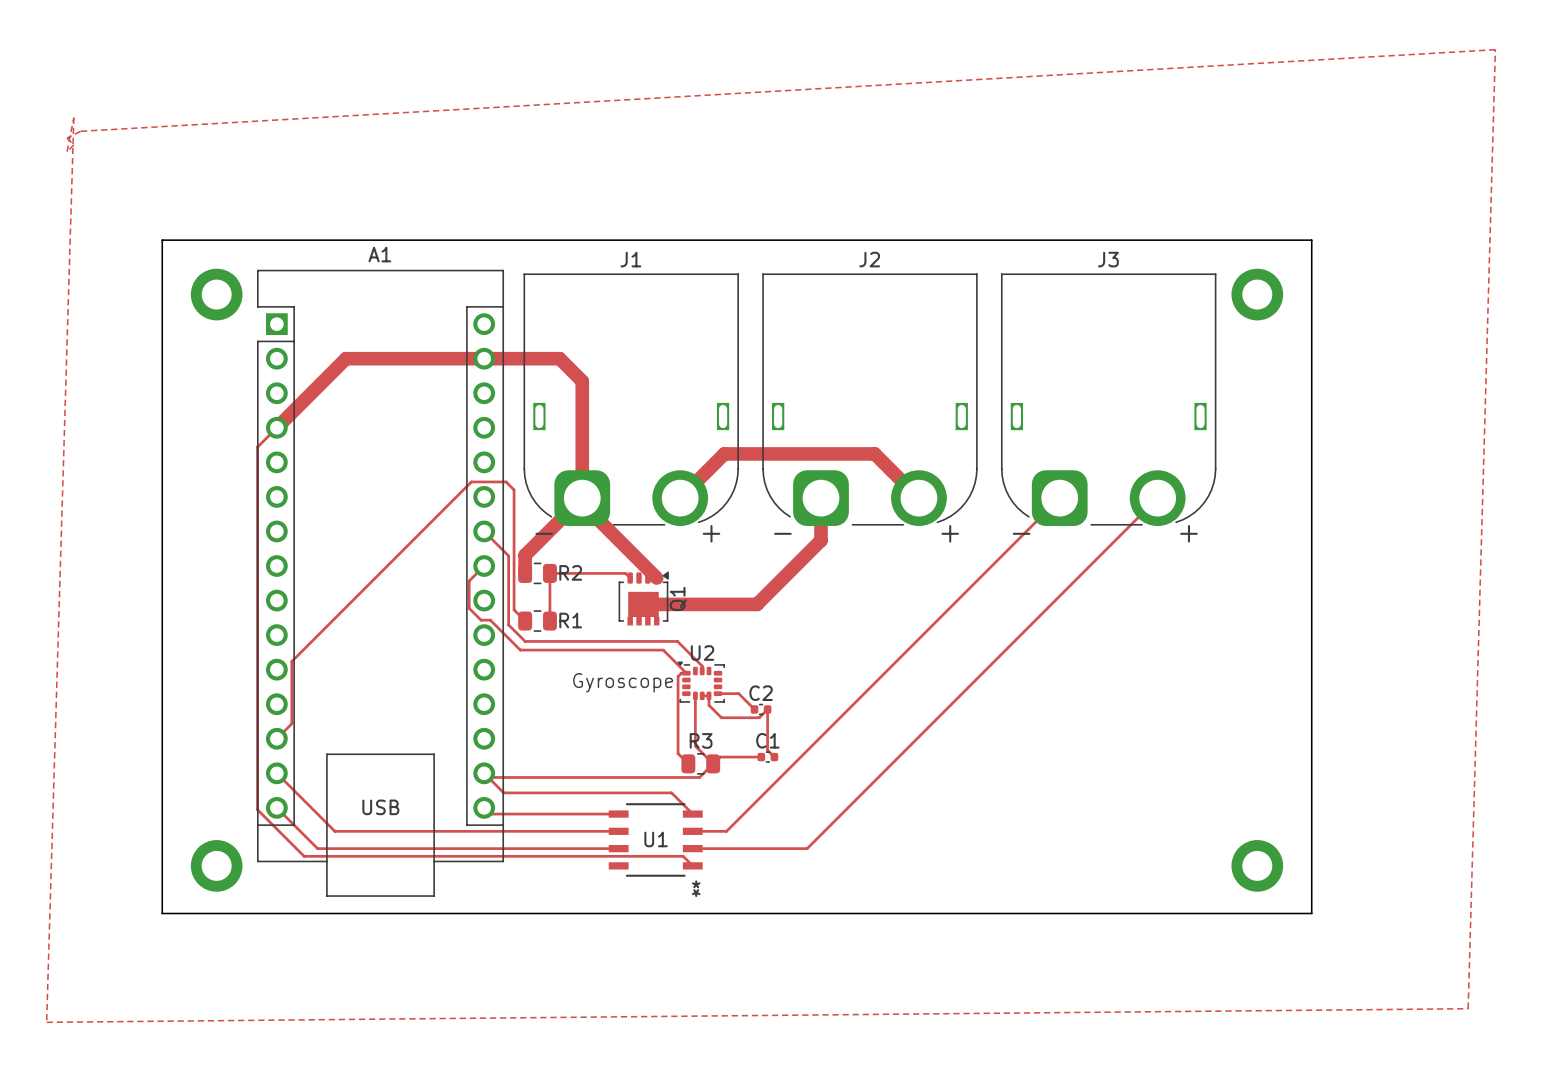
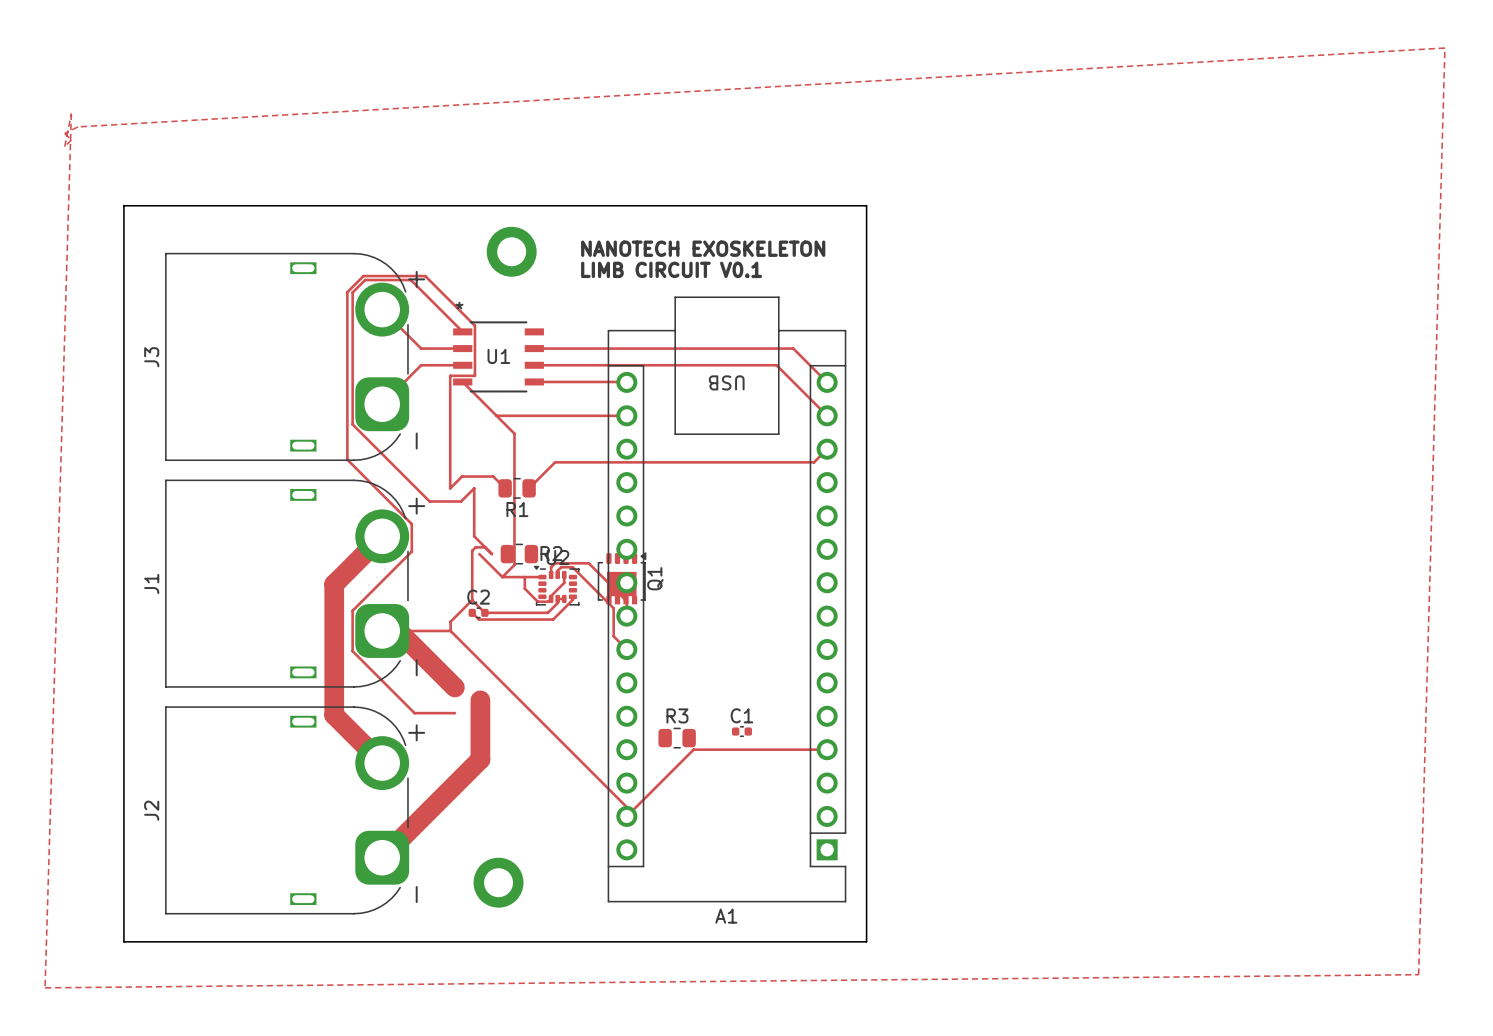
board edge: (162, 240) (1311, 240) (1311, 913) (162, 913) (162, 240) -> (123, 205) (123, 941) (866, 941) (866, 205) (123, 205)
text: none -> NANOTECH EXOSKELETON (703, 248)
text: none -> LIMB CIRCUIT V0.1 (671, 269)
part position: (216, 294) -> (511, 251)
part: (1257, 294) -> none
track: none -> (382, 309) (421, 348) (462, 348)
track: none -> (462, 331) (410, 280) (365, 280) (352, 292) (352, 424) (429, 501) (461, 501) (474, 488) (474, 536) (491, 554)
track: none -> (534, 348) (793, 348) (827, 382)
track: none -> (462, 365) (421, 365) (382, 404)
track: none -> (534, 365) (776, 365) (827, 415)
track: none -> (462, 381) (514, 433) (514, 564) (502, 577)
track: none -> (534, 381) (626, 382)
J1 rotation: 0° (631, 399) -> 90° counterclockwise (287, 583)
J1 position: (631, 399) -> (287, 583)
J2 rotation: 0° (869, 399) -> 90° counterclockwise (287, 810)
J2 position: (869, 399) -> (287, 810)
J3 rotation: 0° (1108, 399) -> 90° counterclockwise (287, 356)
J3 position: (1108, 399) -> (287, 356)
track: none -> (496, 415) (626, 415)
track: none -> (827, 449) (814, 462) (555, 462) (529, 488)
track: (582, 498) (582, 381) (559, 358) (345, 358) (257, 447) (257, 809) (304, 856) (683, 856) (692, 865) -> none
track: (582, 498) (525, 555) (525, 573) -> none
track: (582, 498) (582, 503) (656, 578) -> none
track: (680, 498) (724, 453) (874, 453) (918, 498) -> none
track: (820, 498) (820, 540) (757, 604) (643, 604) -> none
track: (1059, 498) (726, 831) (692, 831) -> none
track: (1157, 498) (807, 848) (692, 848) -> none
track: none -> (505, 488) (493, 476) (462, 476) (450, 488) (450, 376) (474, 375) (474, 325) (425, 276) (363, 276) (347, 292) (347, 459) (411, 524) (411, 551) (352, 610) (352, 651) (414, 713) (454, 713)
track: (484, 531) (508, 555) (508, 624) (525, 641) (677, 641) (702, 666) (702, 671) -> none
track: none -> (382, 536) (334, 584) (334, 715) (382, 763)
track: (484, 566) (469, 580) (469, 608) (481, 620) (490, 620) (520, 650) (663, 650) (686, 673) (681, 673) (678, 676) (678, 753) (688, 763) -> none
track: none -> (485, 547) (475, 547) (472, 550) (472, 600) (484, 612) (547, 612) (557, 603) (557, 598) (564, 598)
track: none -> (479, 554) (502, 577)
track: (630, 578) (625, 573) (549, 573) (549, 621) -> none
A1 rotation: 0° (380, 583) -> 180° (726, 599)
track: none -> (551, 574) (551, 567) (555, 563) (588, 563) (626, 601) (626, 616)
track: none -> (557, 574) (557, 570) (561, 567) (572, 567) (613, 608) (613, 636) (626, 649)
track: none -> (564, 574) (564, 582) (551, 596) (548, 601) (537, 601) (524, 588) (524, 577)
track: none -> (502, 577) (542, 577)
track: none -> (572, 596) (572, 599) (553, 619) (478, 619) (472, 612)
R1 name position: R1 (570, 620) -> R1 (517, 509)
track: none -> (472, 600) (450, 621) (450, 630)
track: (525, 621) (514, 609) (514, 489) (506, 481) (471, 481) (291, 661) (291, 723) (276, 738) -> none
R1 position: (537, 621) -> (517, 488)
track: none -> (450, 630) (382, 630) (398, 630) (454, 687)
track: none -> (450, 630) (626, 807) (626, 816) (693, 749) (827, 749)
text: Gyroscope (623, 682) -> none
U2 position: (701, 682) -> (556, 585)
track: (718, 693) (738, 693) (754, 709) -> none
track: (695, 695) (695, 746) (713, 763) -> none
track: (702, 695) (709, 695) (709, 705) (721, 717) (759, 717) (767, 709) (767, 750) (774, 757) -> none
C2 position: (761, 709) -> (478, 612)
track: none -> (480, 700) (480, 759) (382, 857)
track: (761, 757) (719, 757) (699, 777) (488, 777) -> none
track: (276, 773) (334, 831) (618, 831) -> none
track: (484, 773) (503, 792) (671, 792) (692, 814) -> none
track: (276, 807) (317, 848) (618, 848) -> none
track: (484, 807) (490, 814) (618, 814) -> none
U1 rotation: 0° (655, 839) -> 180° (498, 356)
U1 position: (655, 839) -> (498, 356)
part position: (216, 865) -> (498, 882)
part: (1257, 865) -> none

